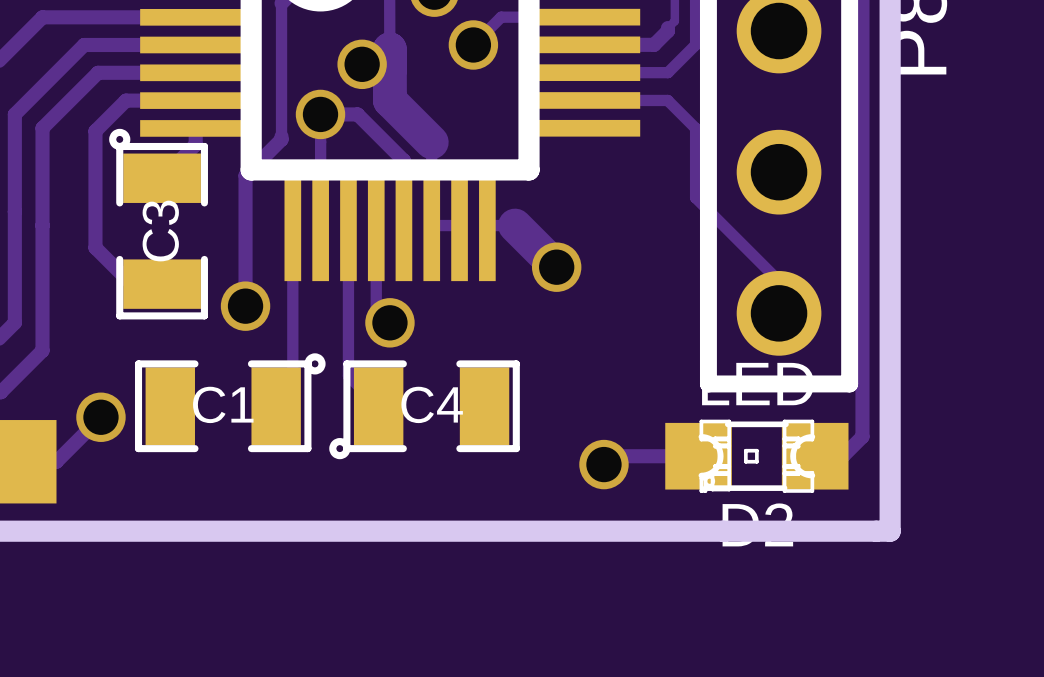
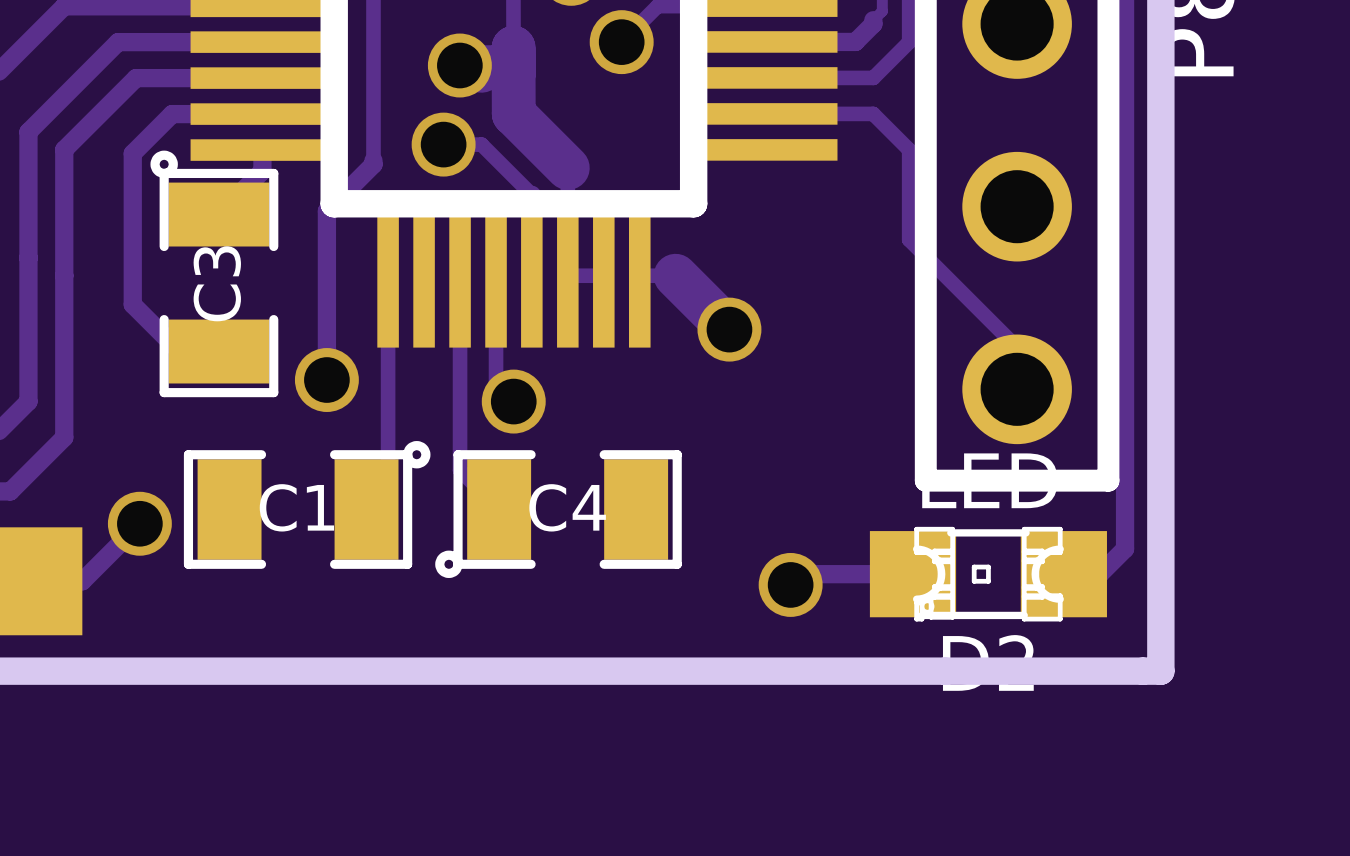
via position: (362, 64) -> (459, 65)
via position: (320, 114) -> (443, 144)
track: (403, 163) (403, 160) (357, 114) (320, 114) (320, 225) -> (531, 194) (481, 144) (443, 144)

